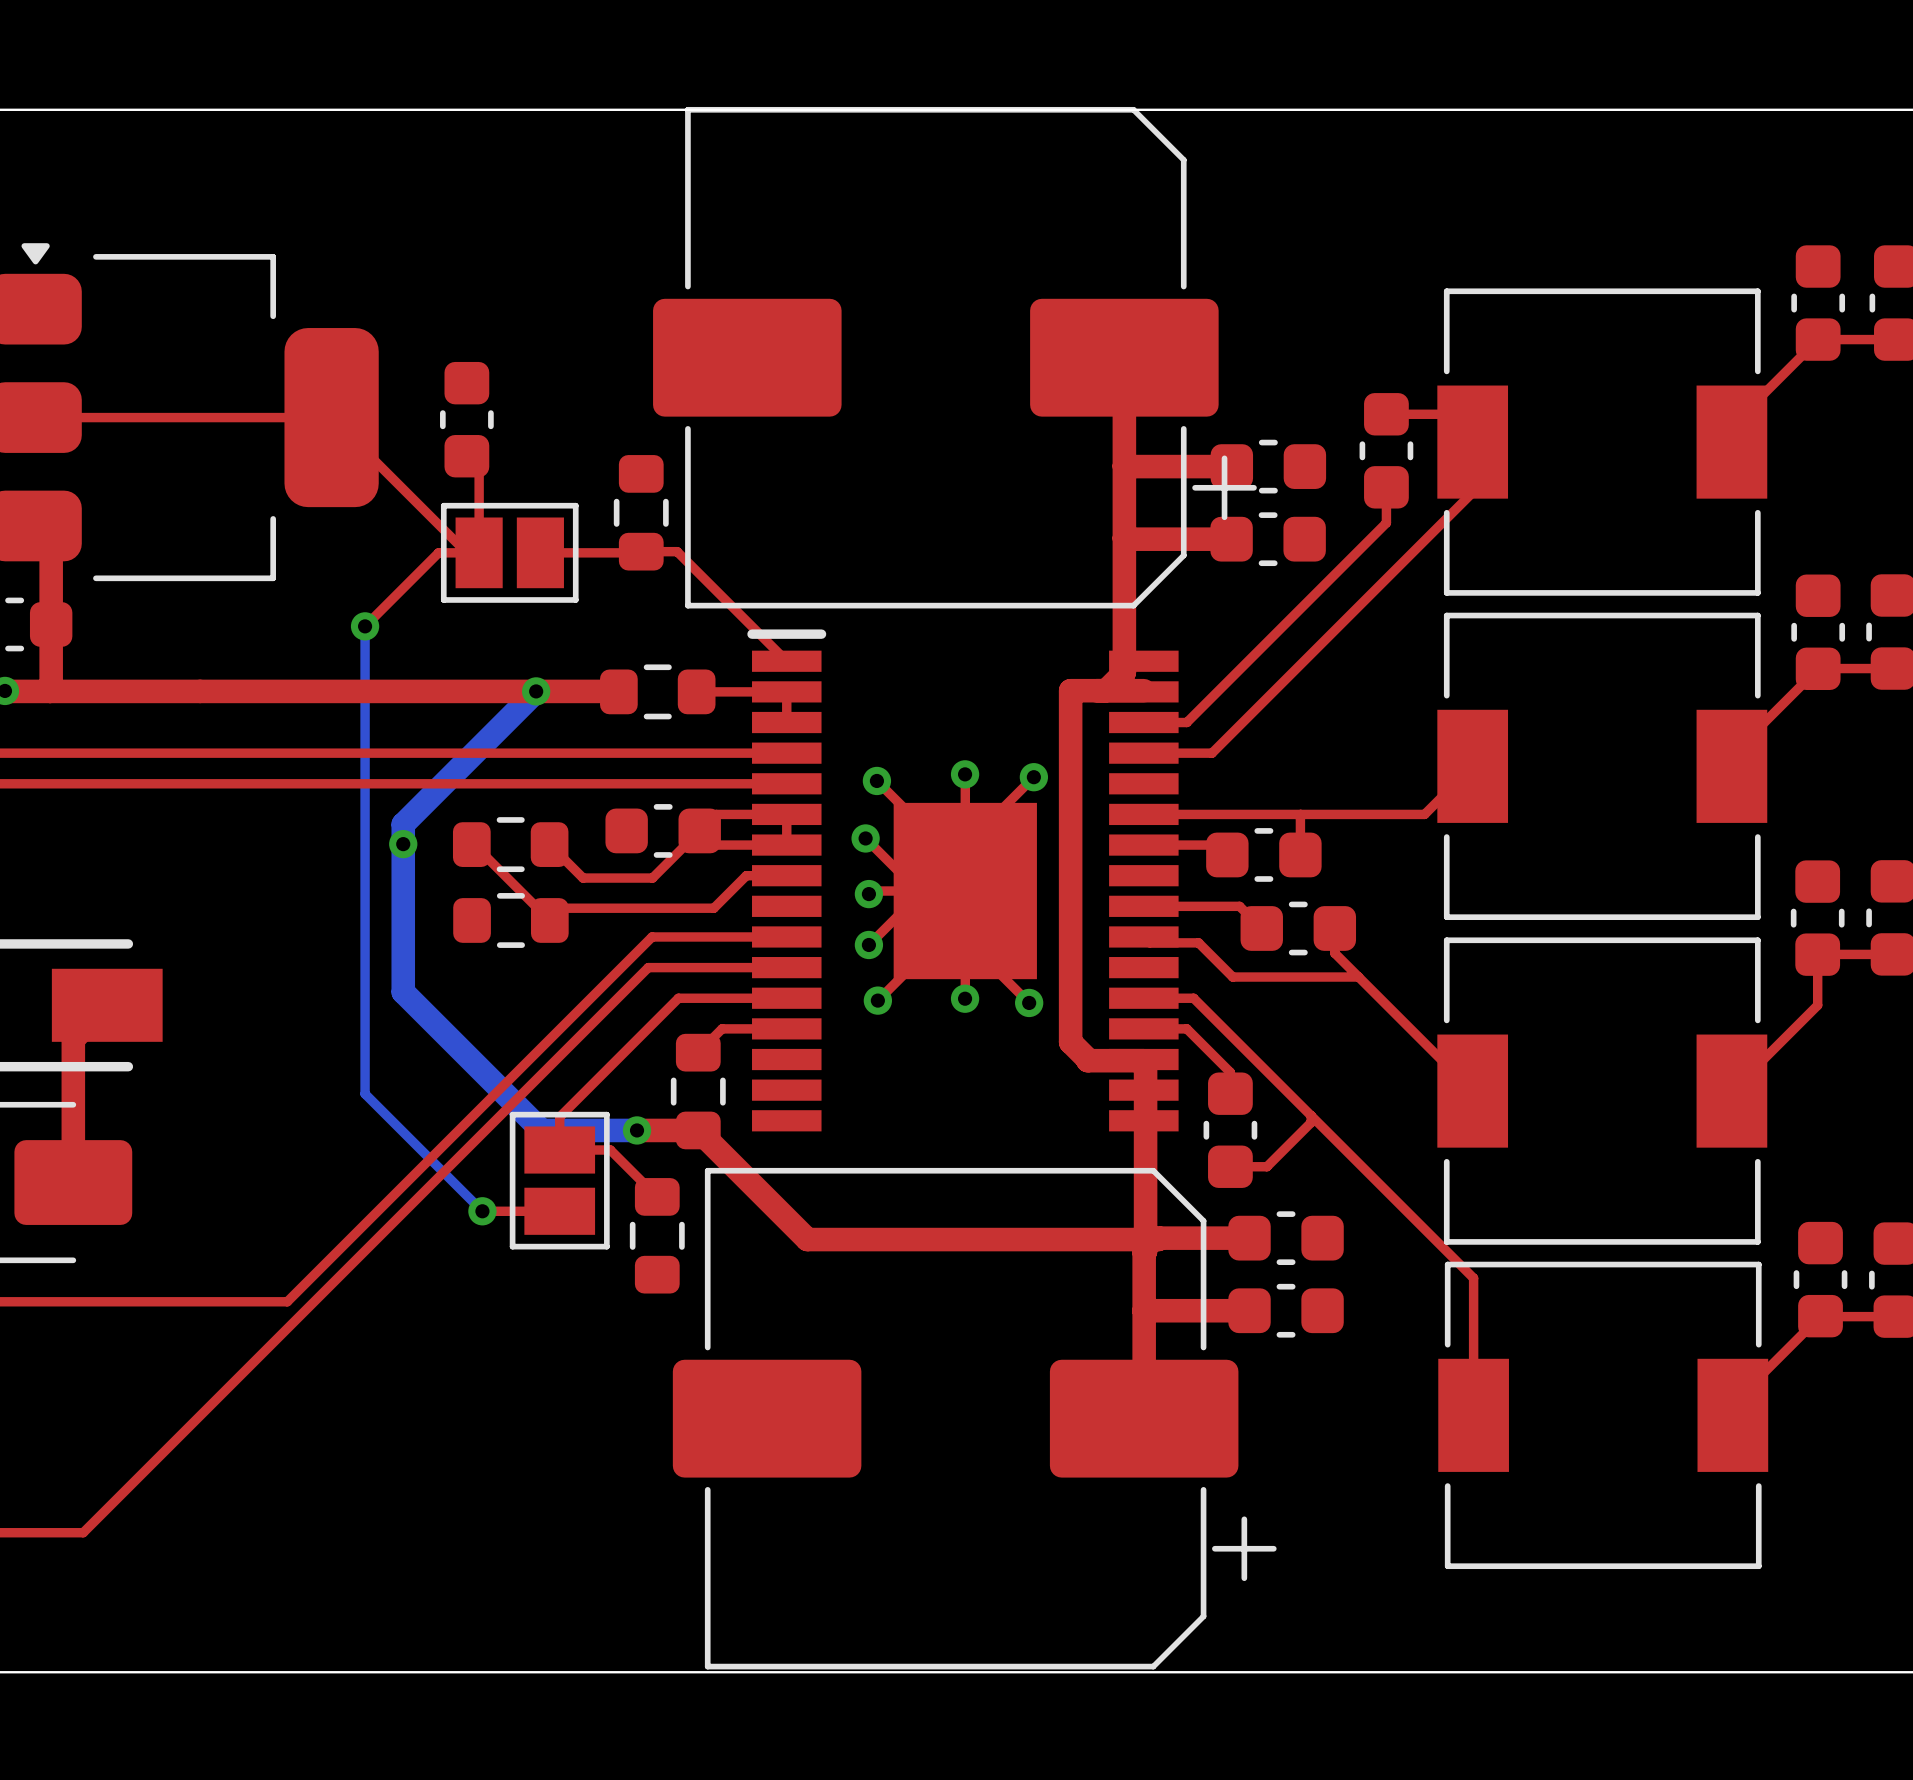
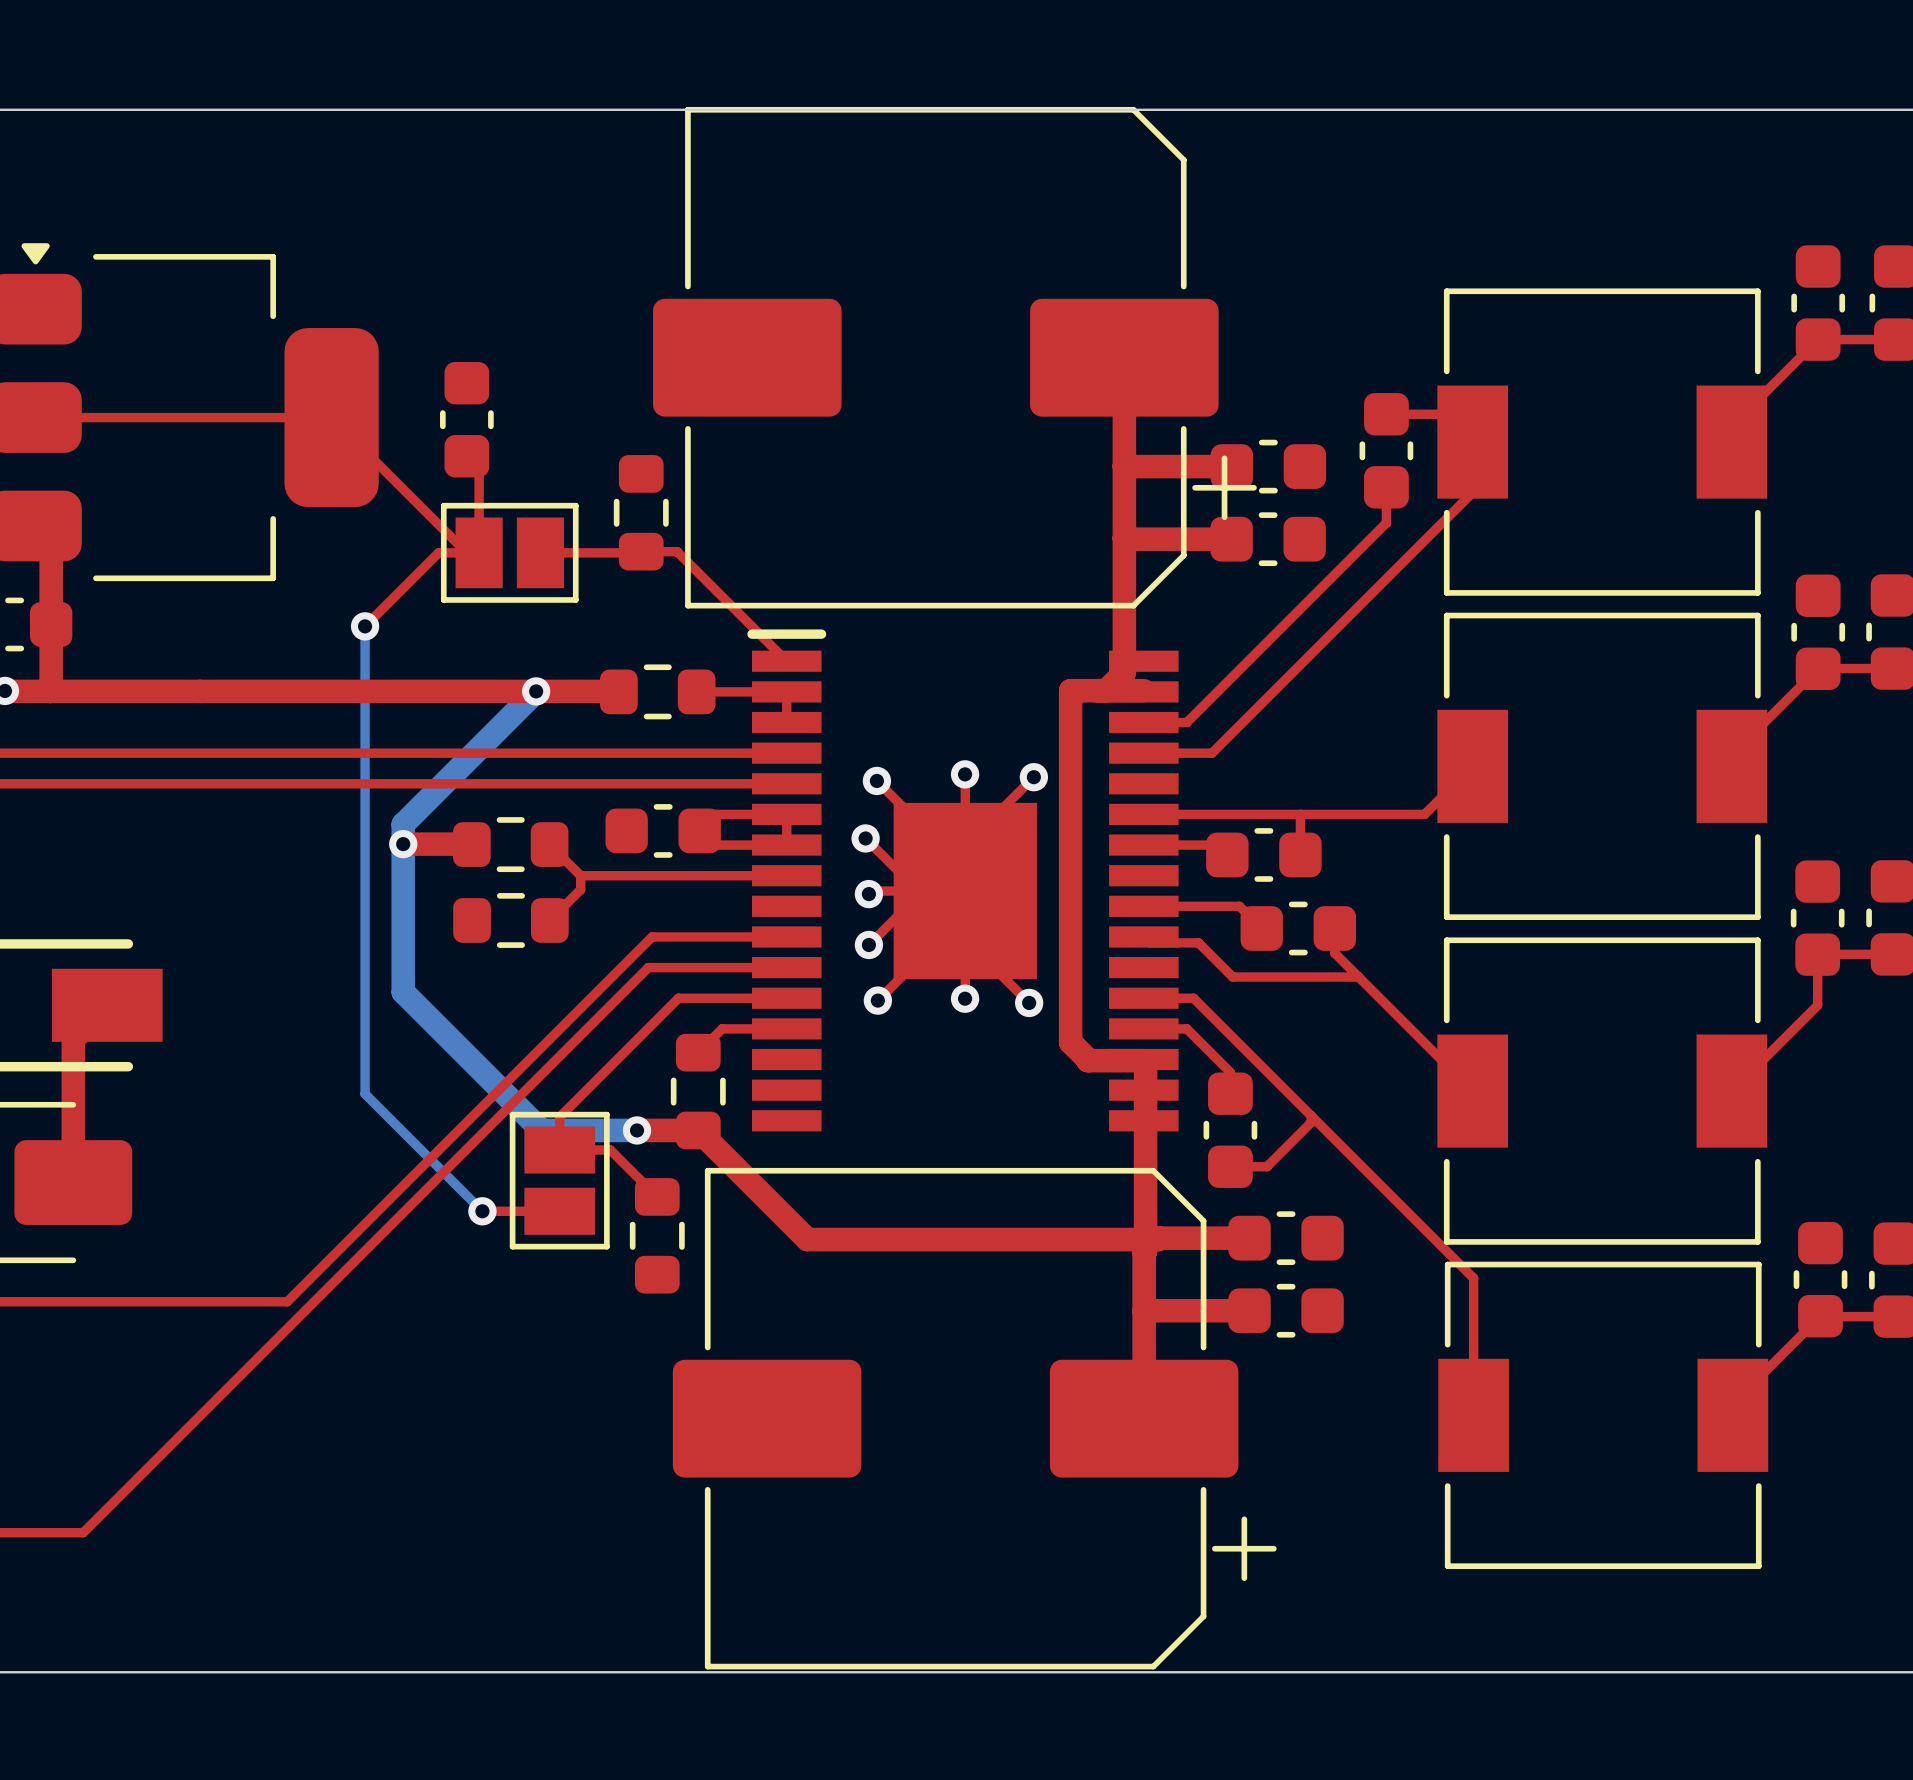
top track: (699, 830) (652, 878) (583, 878) (580, 875) -> none
top track: (471, 844) (543, 914) -> (471, 844) (403, 844)
top track: (746, 875) (713, 908) (562, 908) -> (746, 875) (580, 875) (580, 889) (562, 908)

